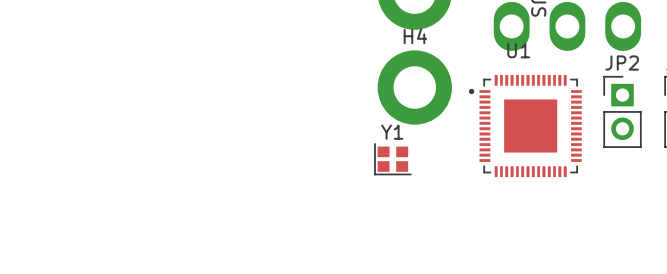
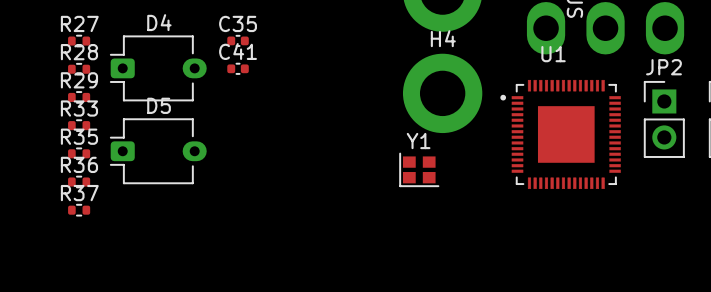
R27: none -> (79, 41)
C35: none -> (238, 40)
R28: none -> (79, 69)
D4: none -> (158, 68)
C41: none -> (238, 68)
R29: none -> (79, 97)
R33: none -> (79, 125)
D5: none -> (158, 151)
R35: none -> (79, 153)
R36: none -> (79, 181)
R37: none -> (79, 210)

